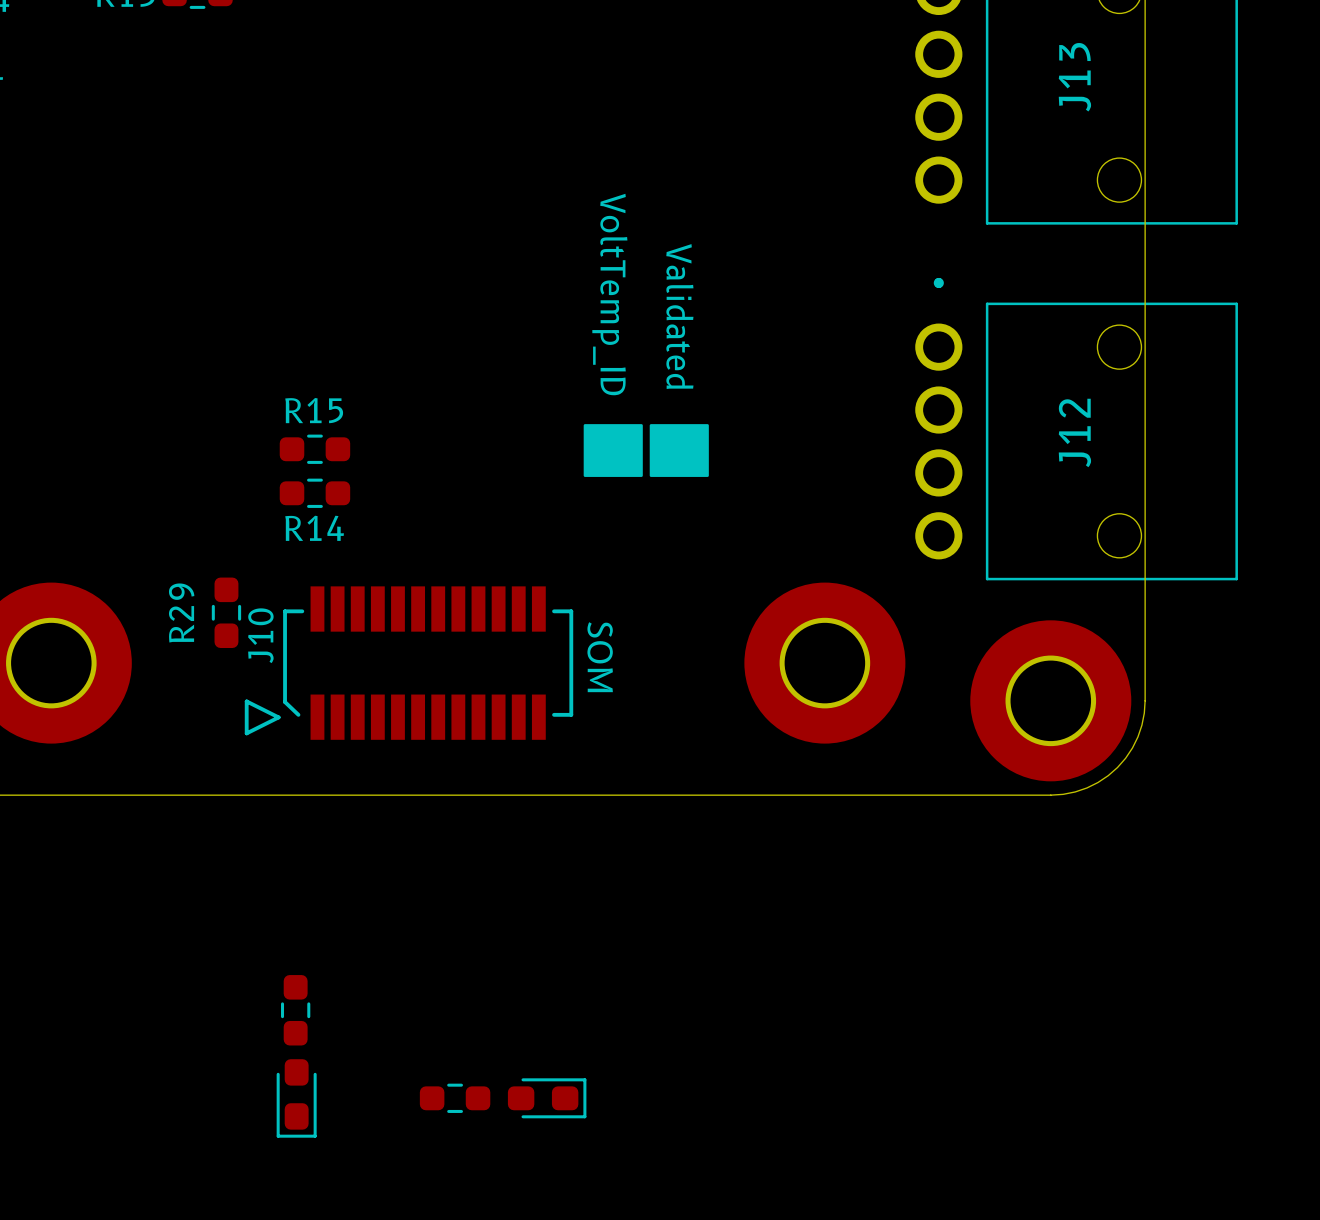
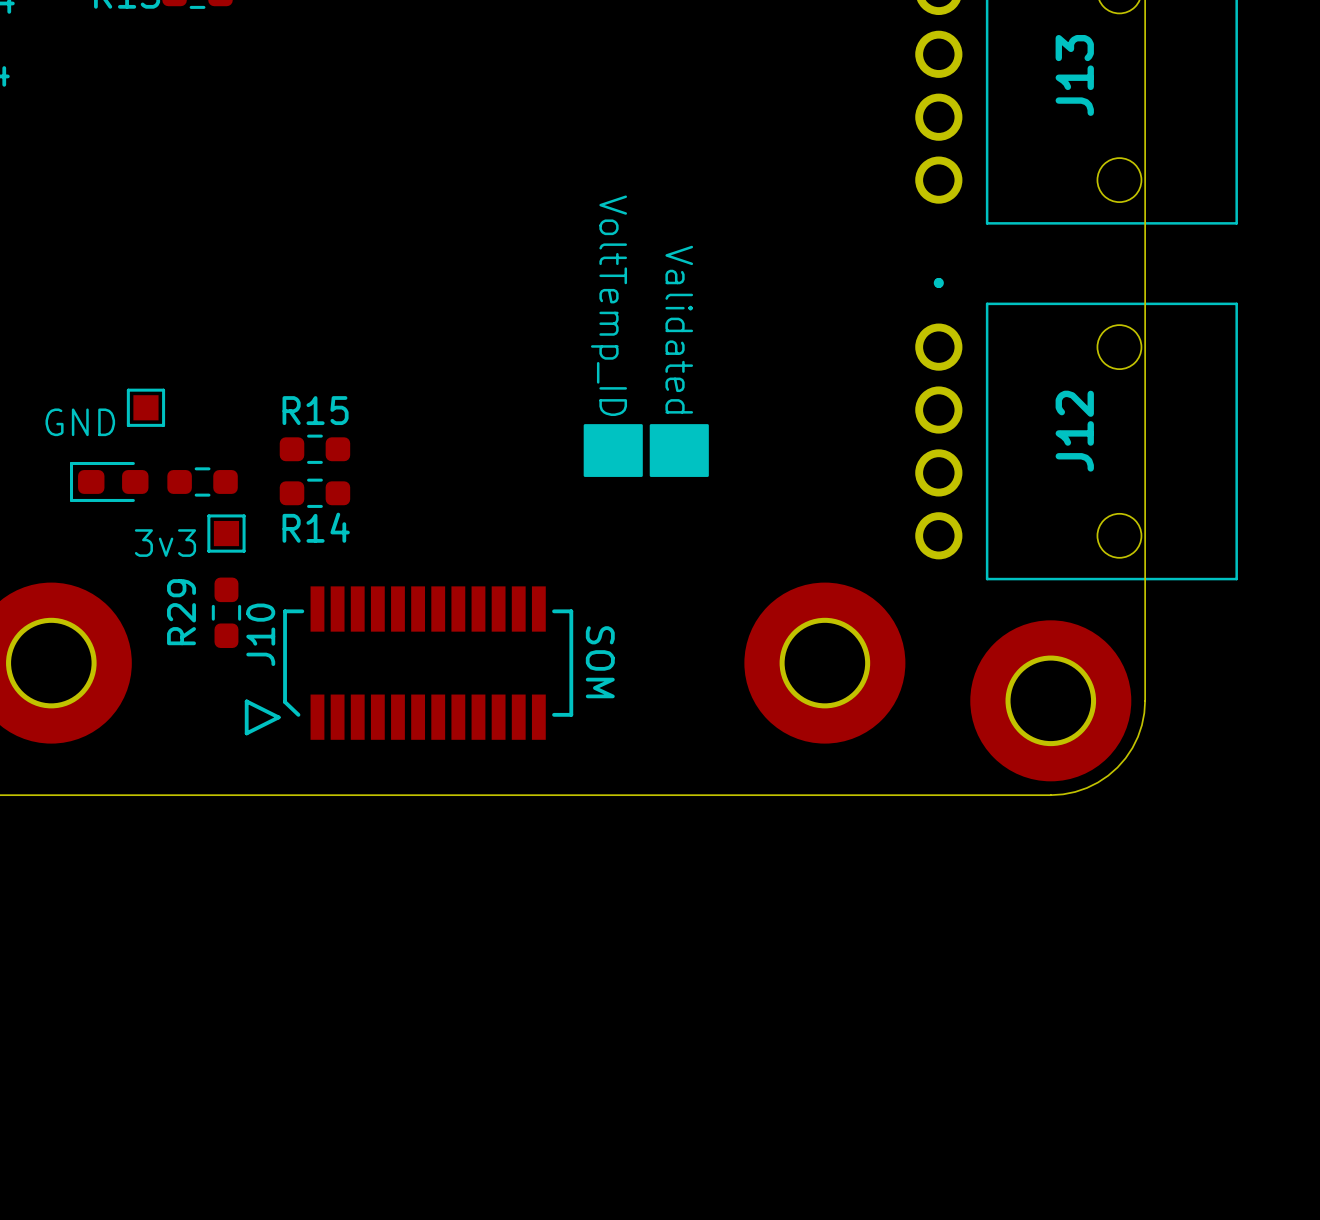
part: none -> (145, 407)
text: none -> GND (80, 422)
part: none -> (109, 481)
part: none -> (202, 481)
part: none -> (226, 533)
text: none -> 3v3 (165, 543)
part: (295, 1010) -> none
part: (296, 1098) -> none
part: (455, 1098) -> none
part: (547, 1098) -> none

